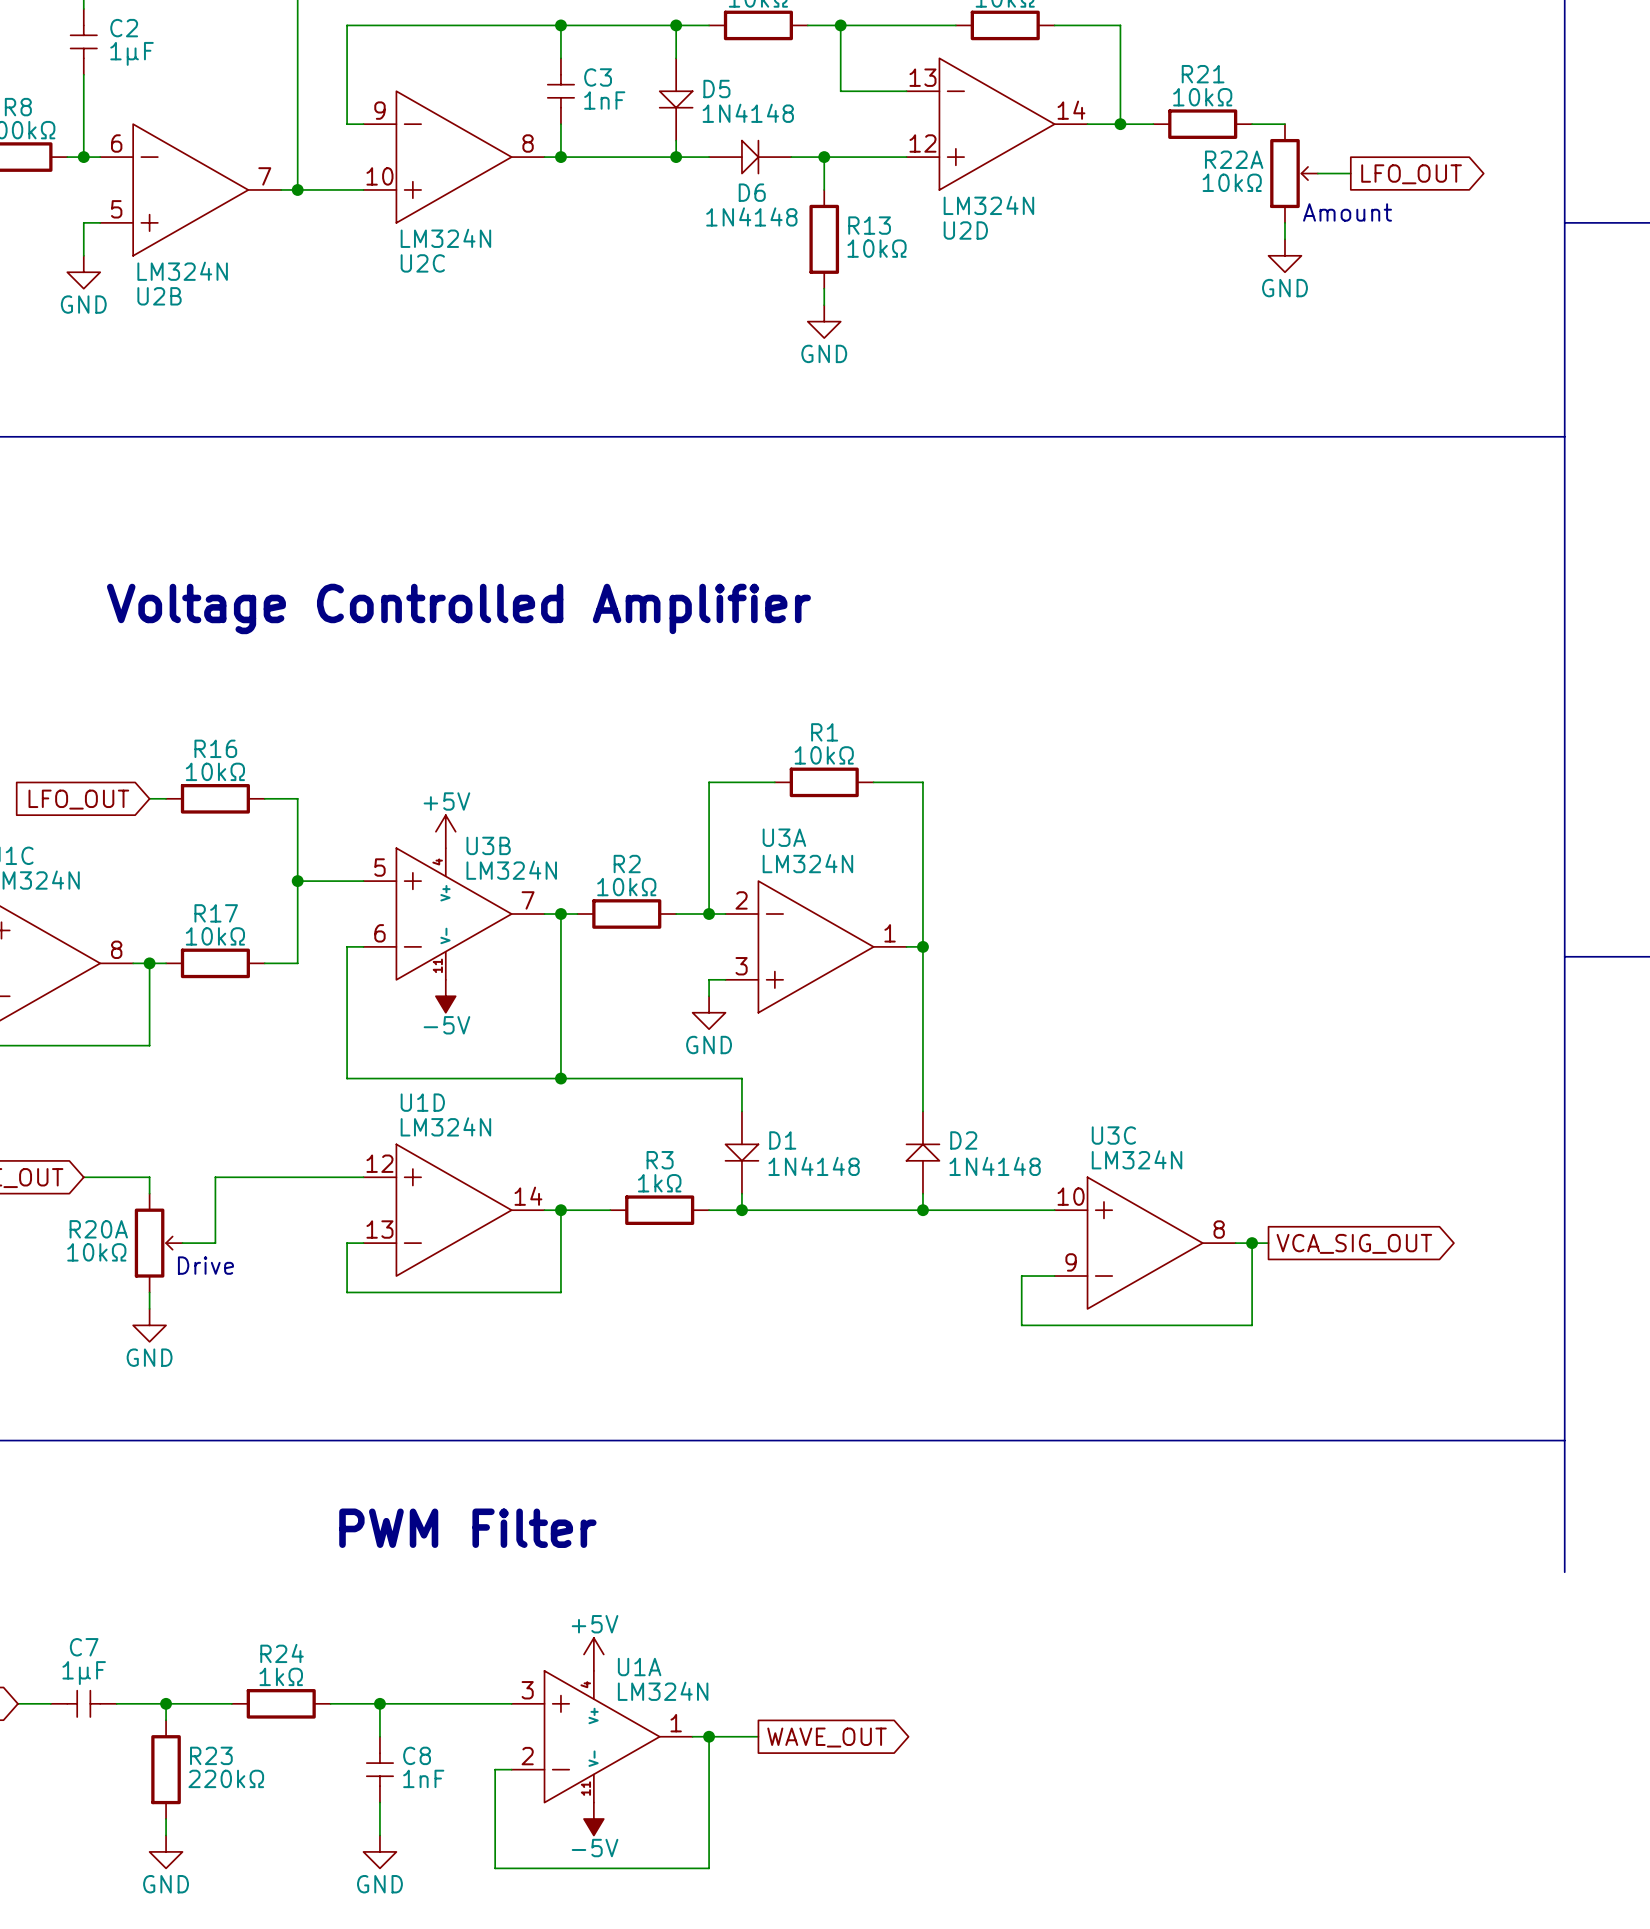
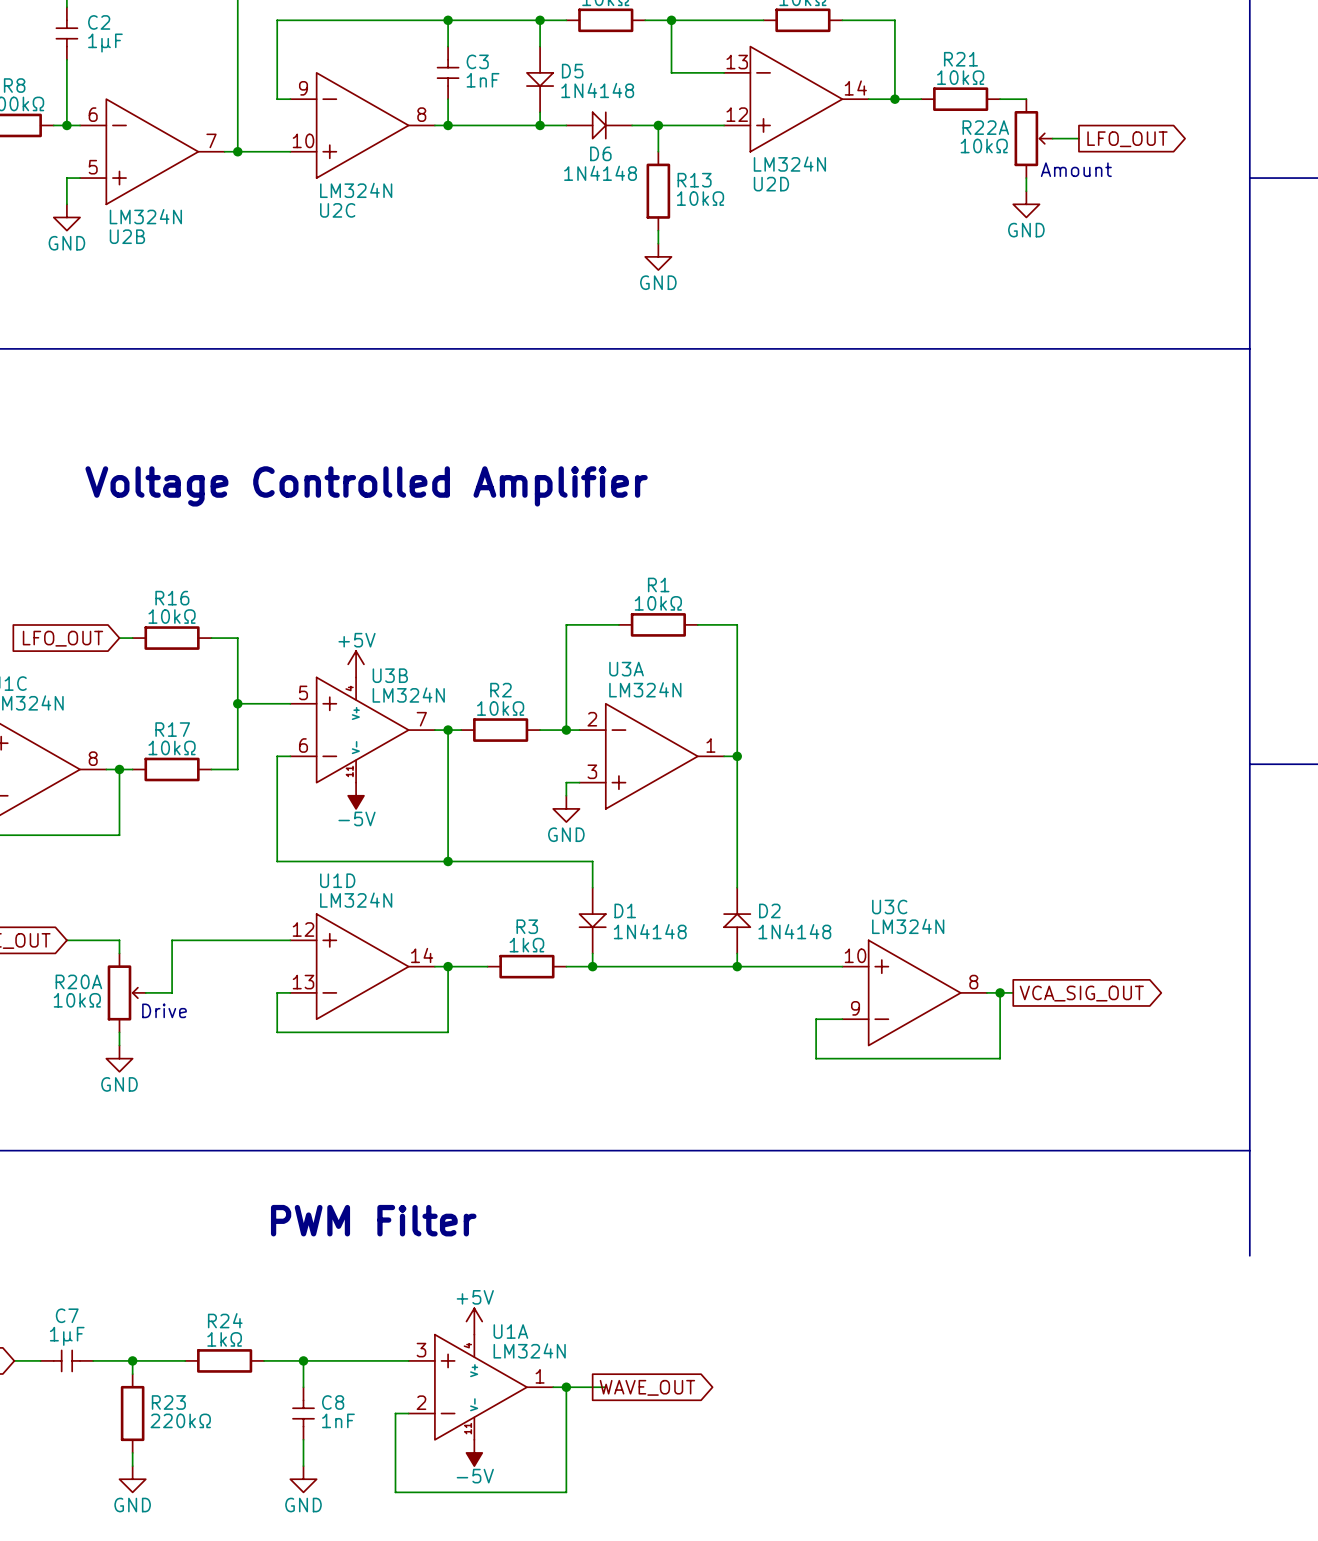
global label position: WAVE_OUT (827, 1737) -> WAVE_OUT (647, 1387)

